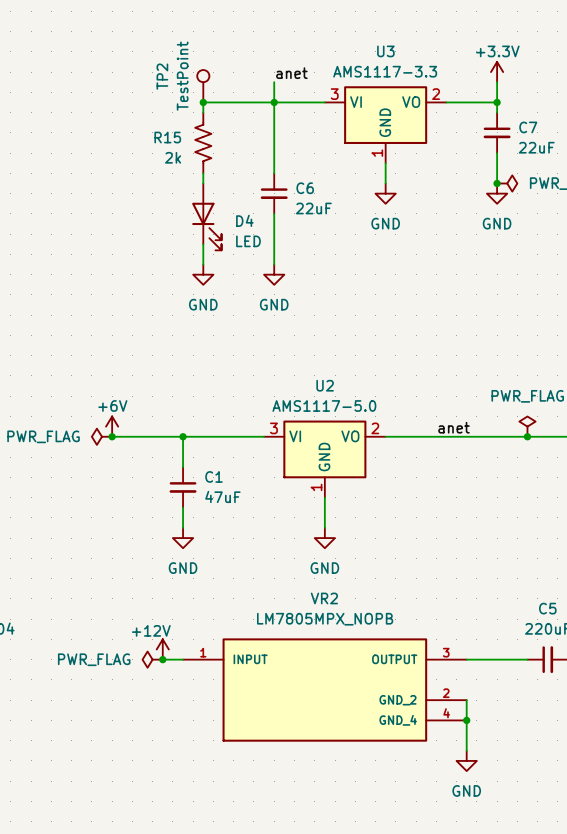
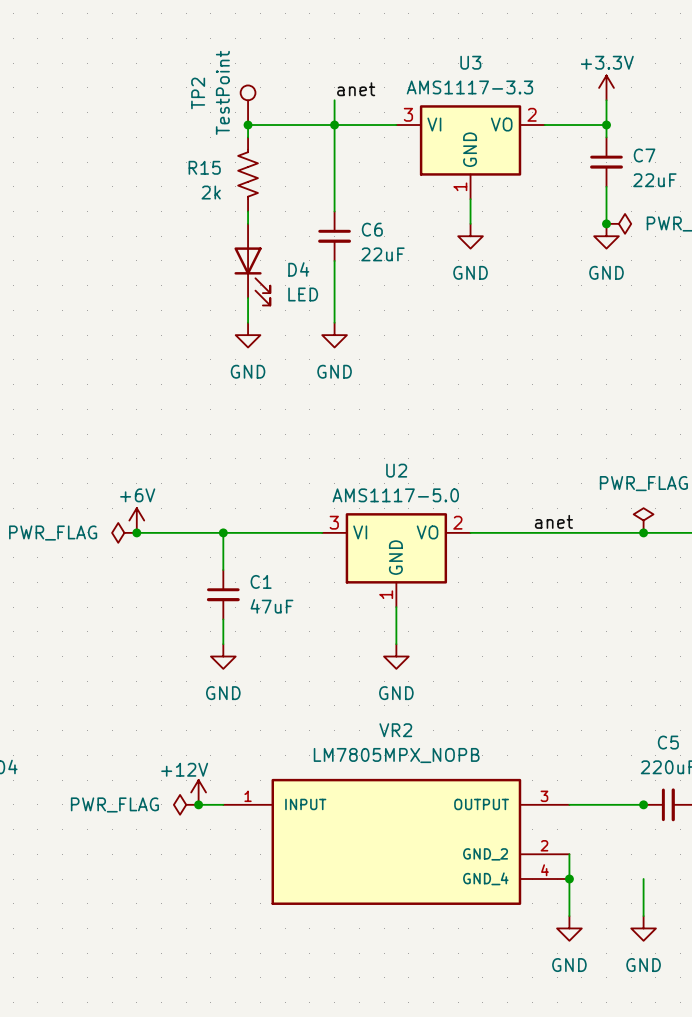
junction: none -> (643, 804)
wire: none -> (643, 879) (643, 916)
power symbol: none -> GND (643, 928)

